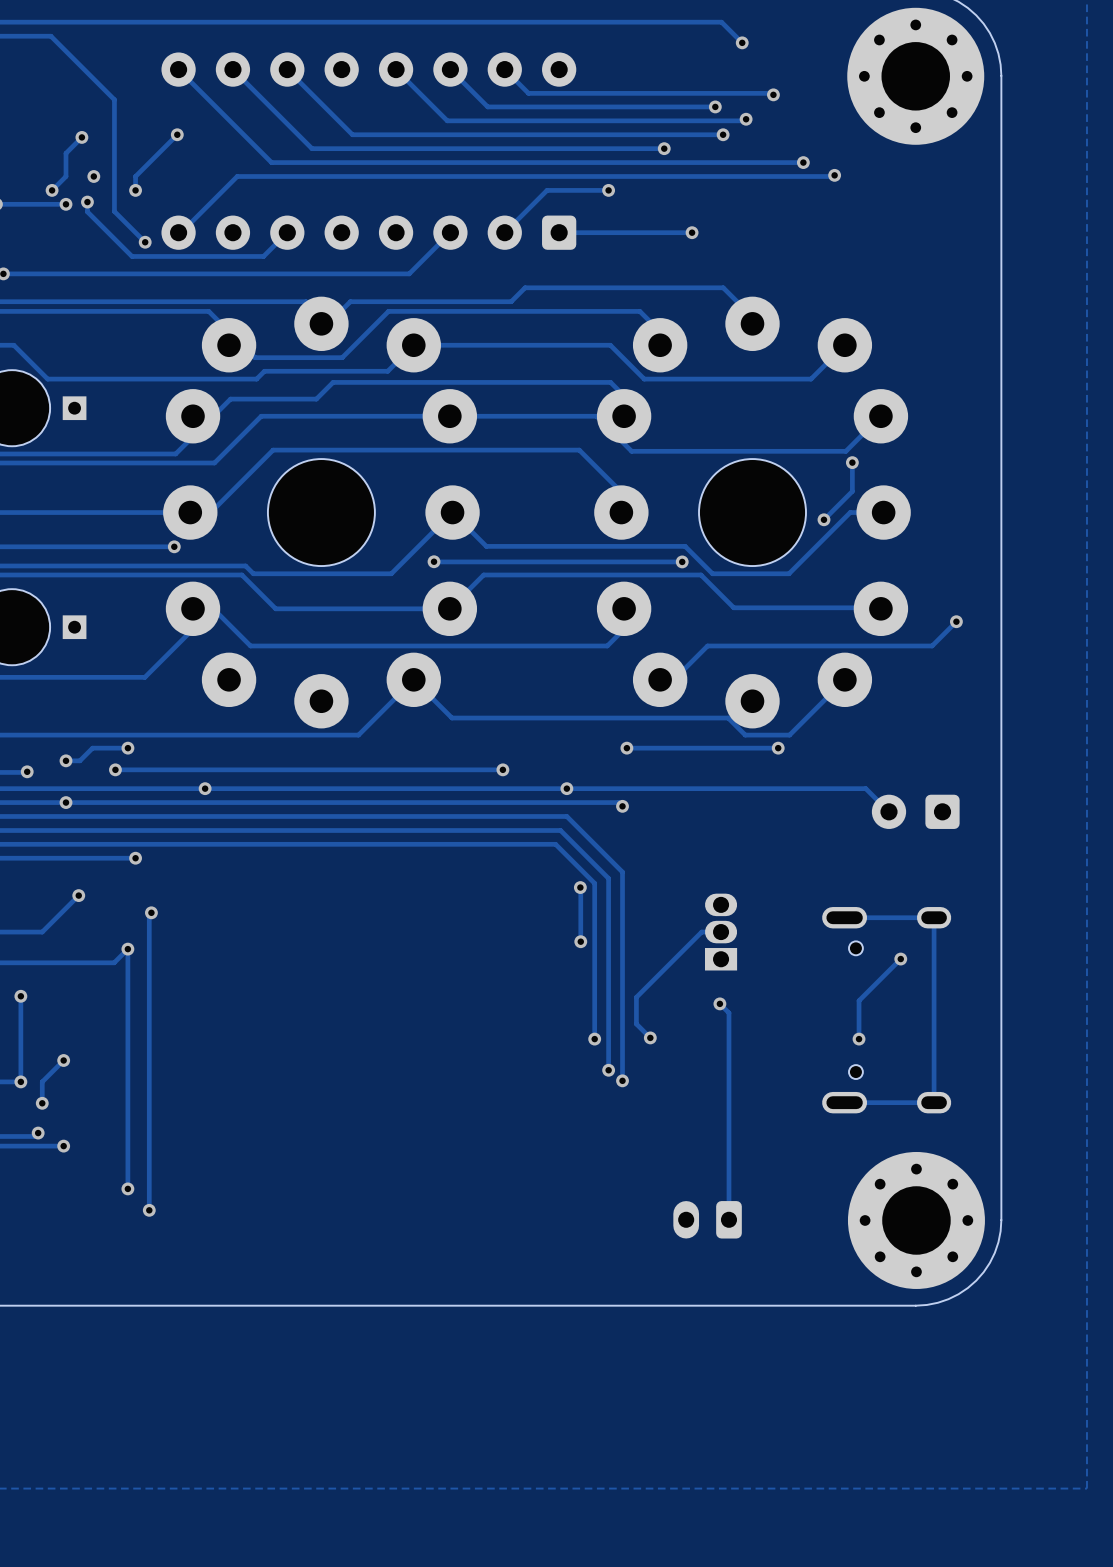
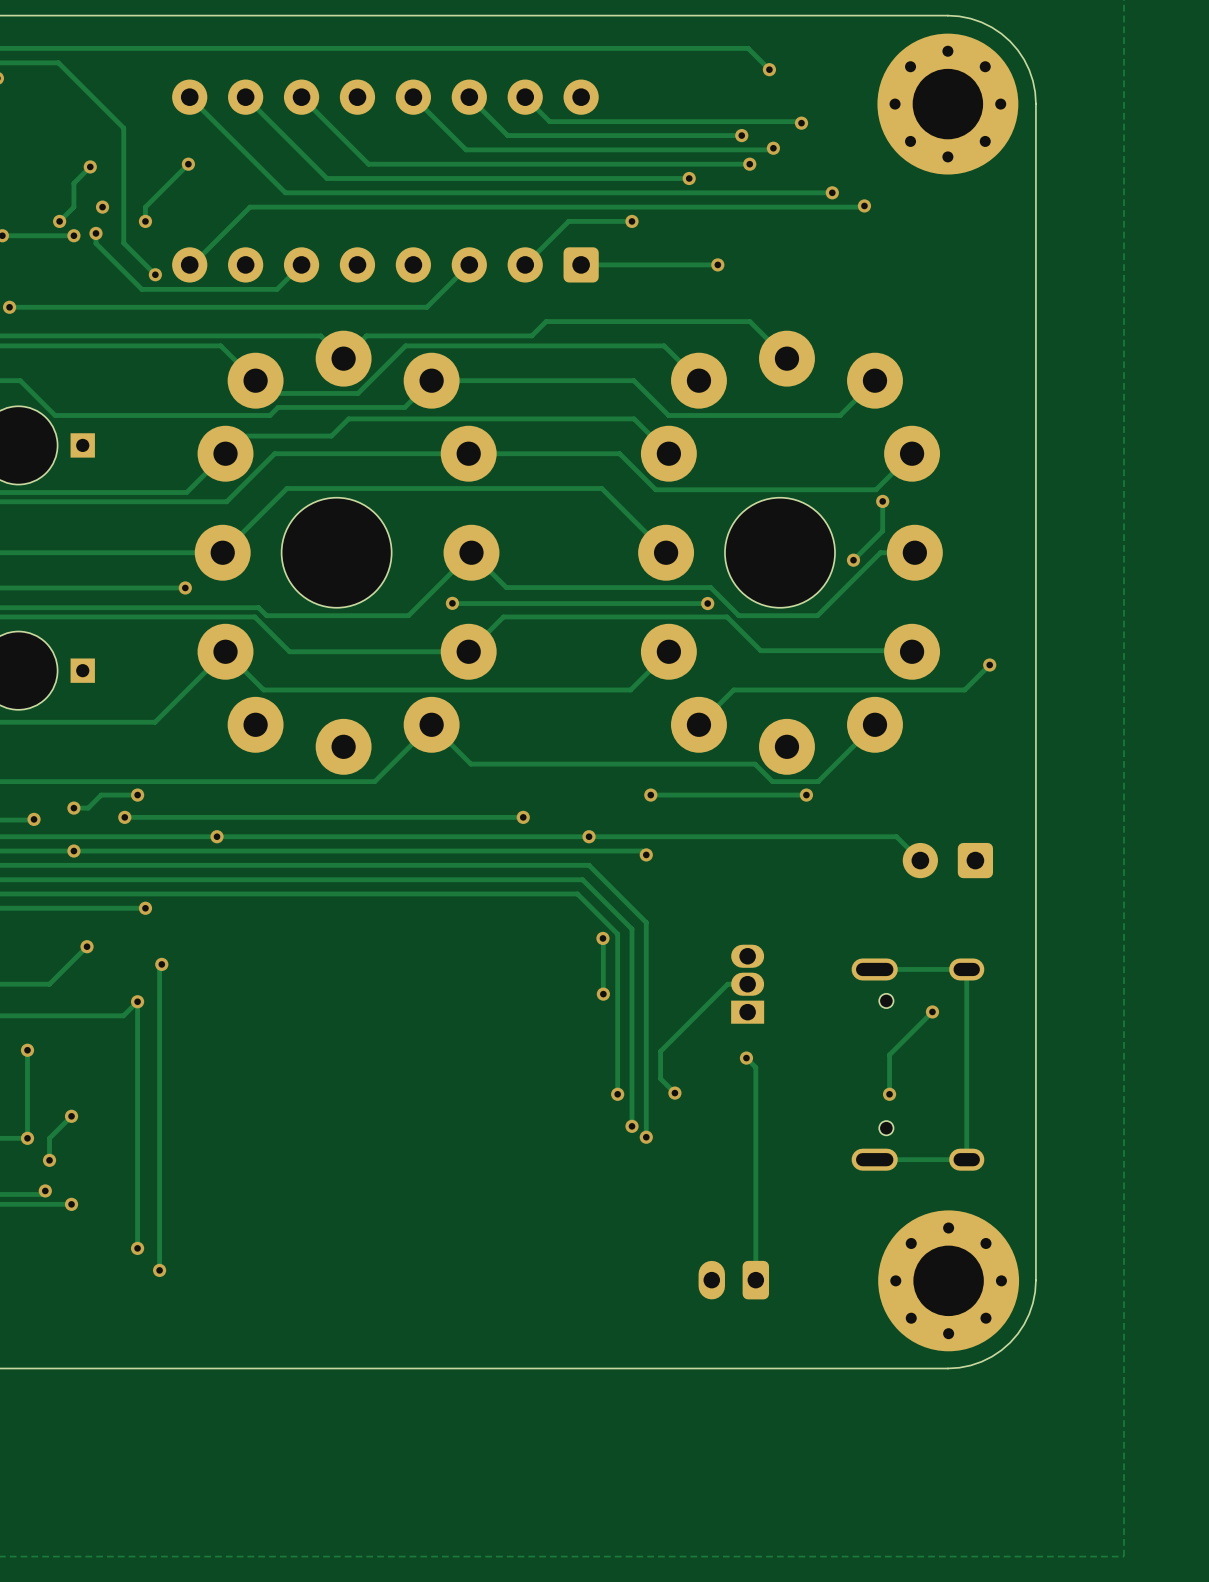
part footprint: [163, 296, 480, 729] -> [194, 330, 500, 775]
part footprint: [594, 296, 911, 729] -> [638, 330, 943, 775]

